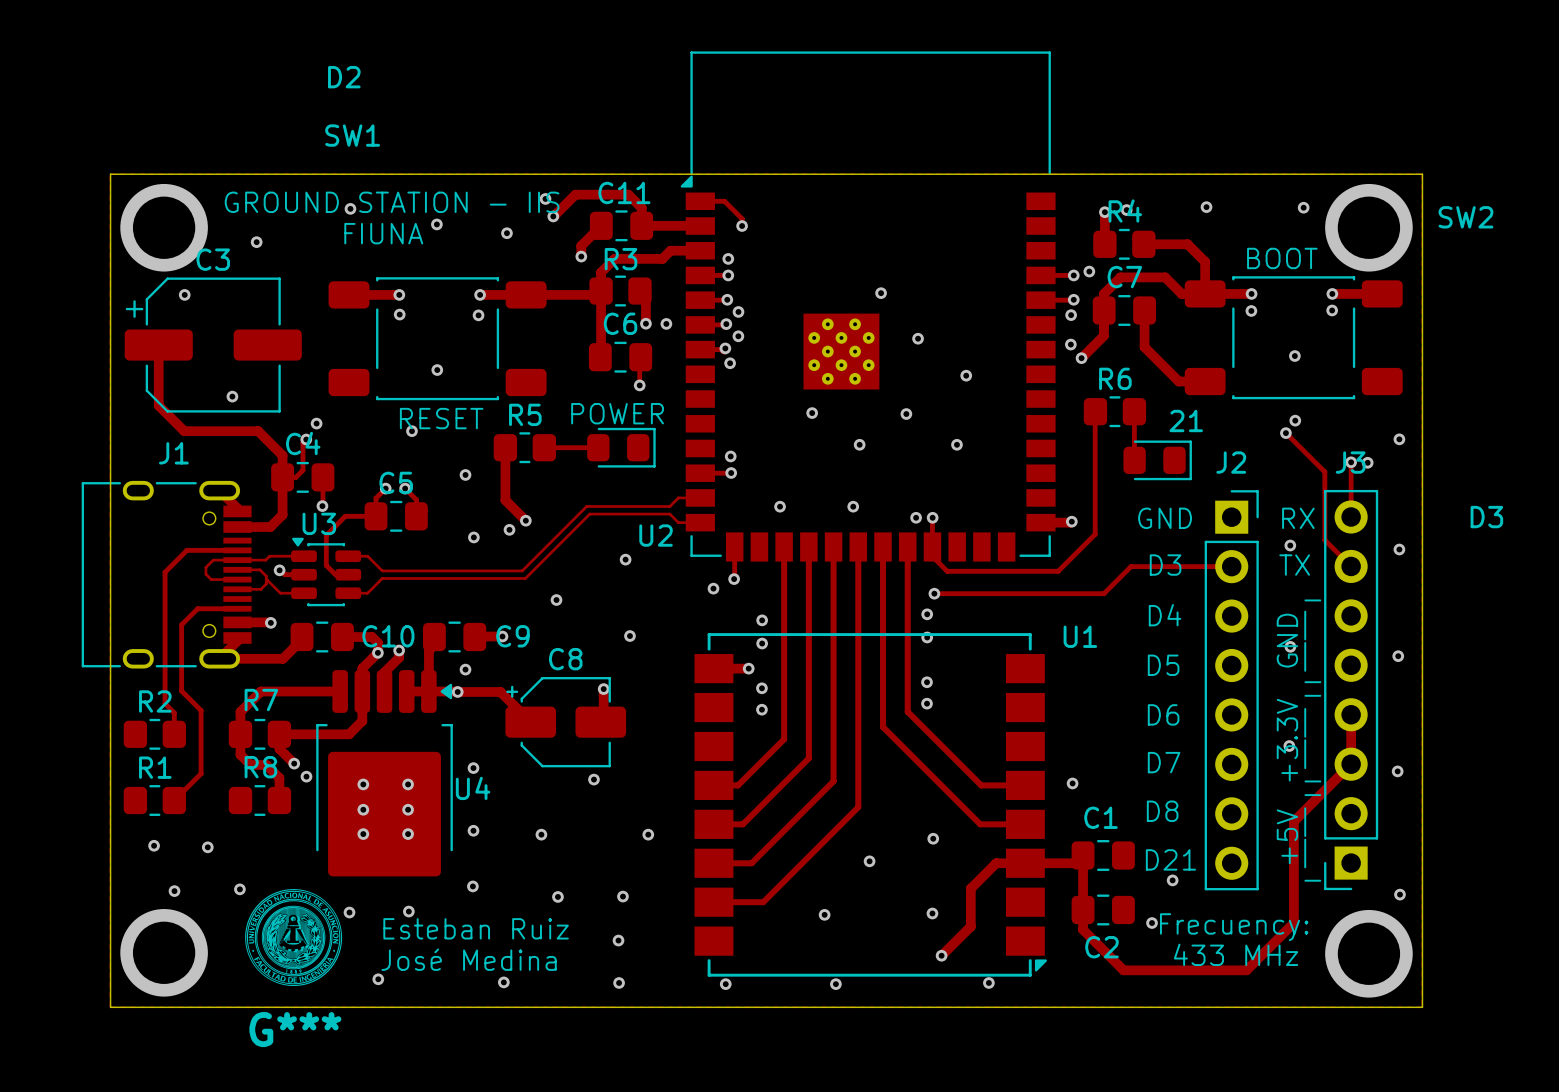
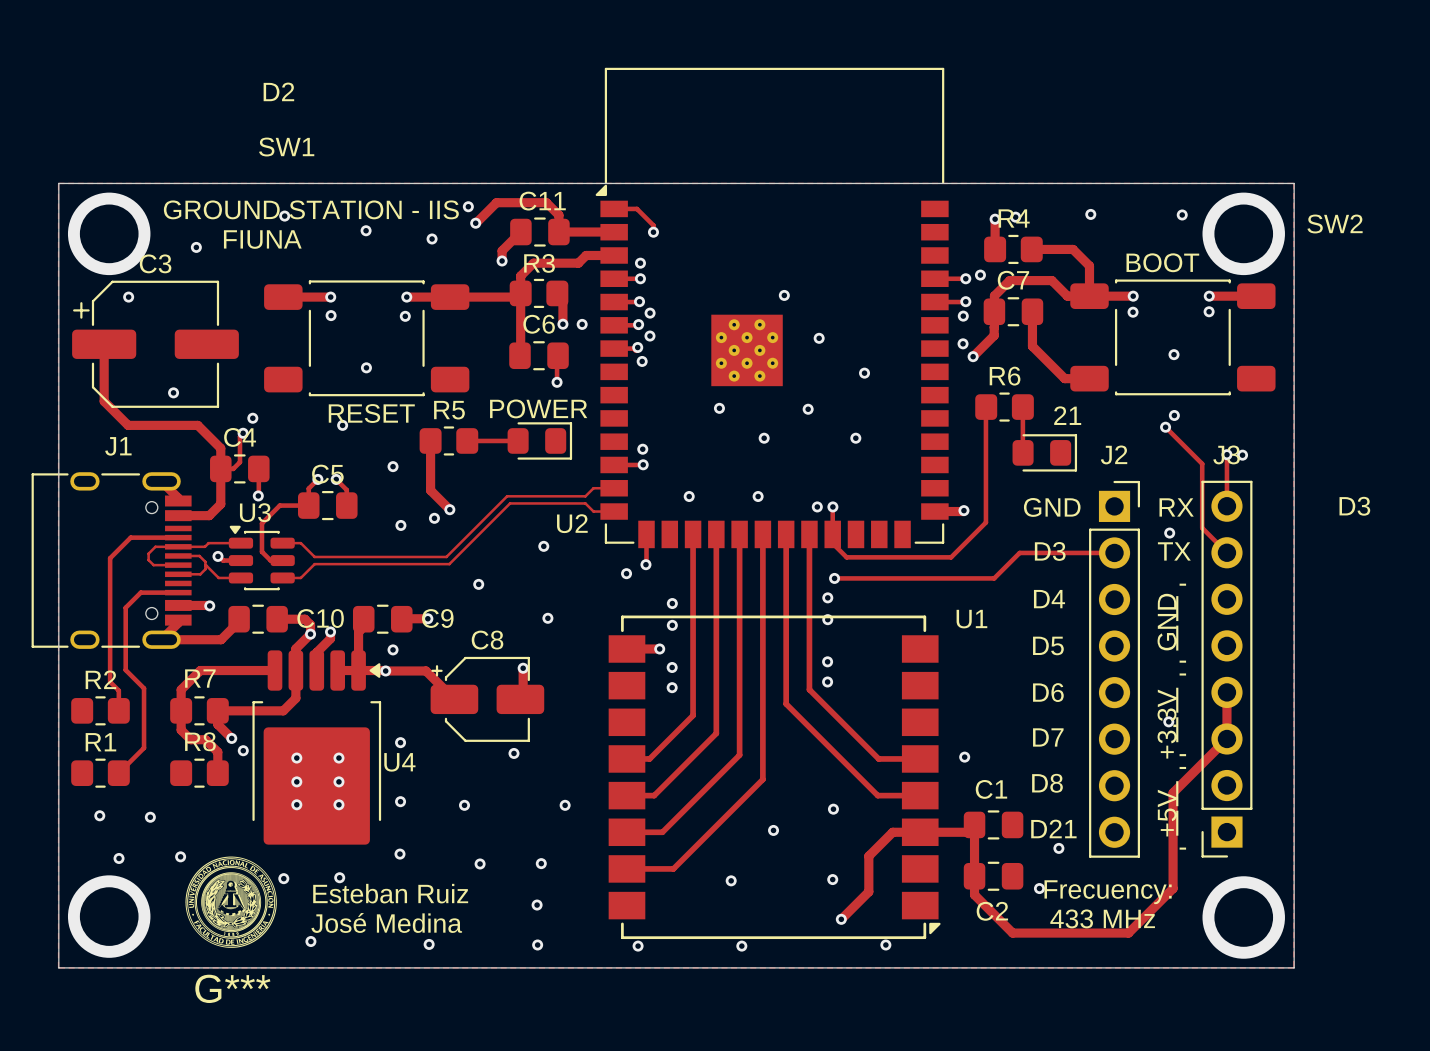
via: (1399, 439) -> none
via: (1399, 549) -> none
via: (1290, 646) -> none
via: (1398, 656) -> none
via: (1397, 771) -> none
via: (1399, 894) -> none

